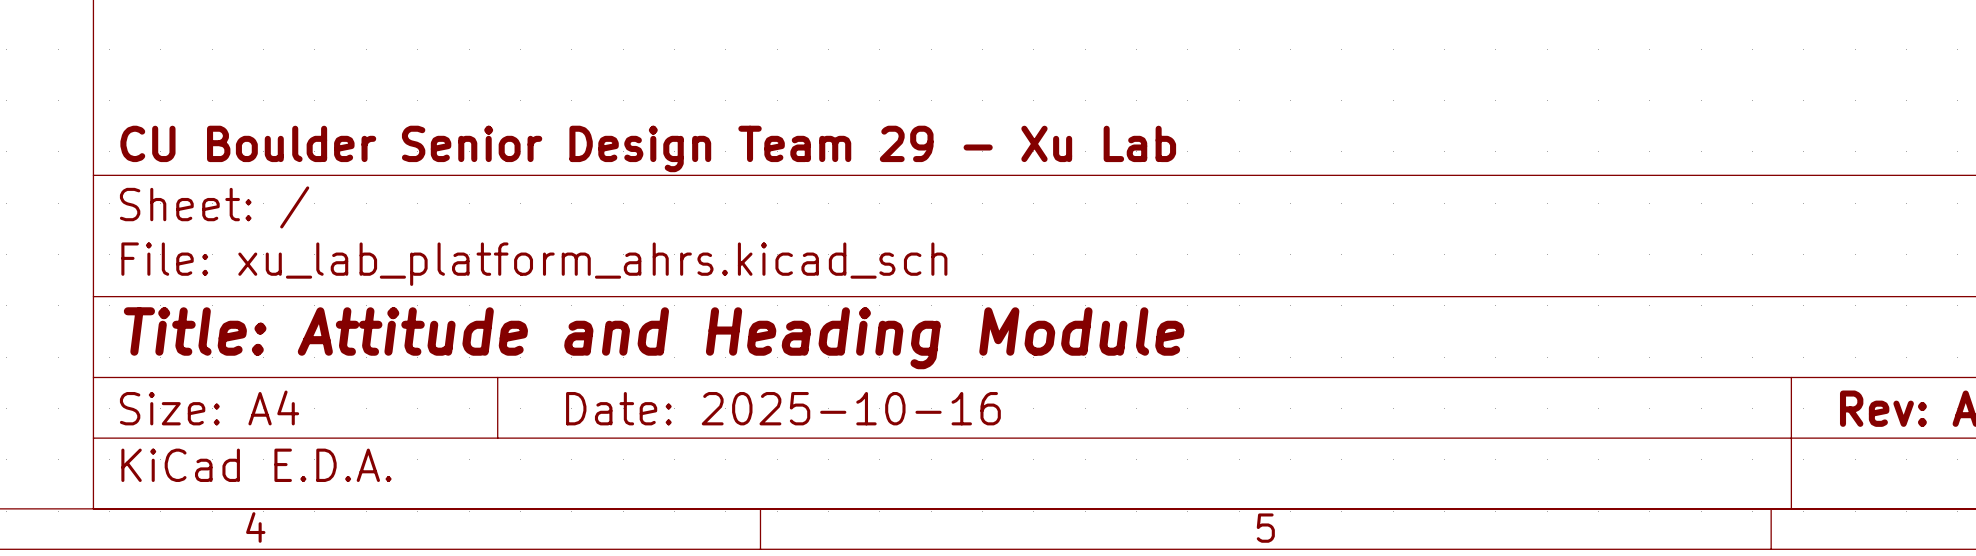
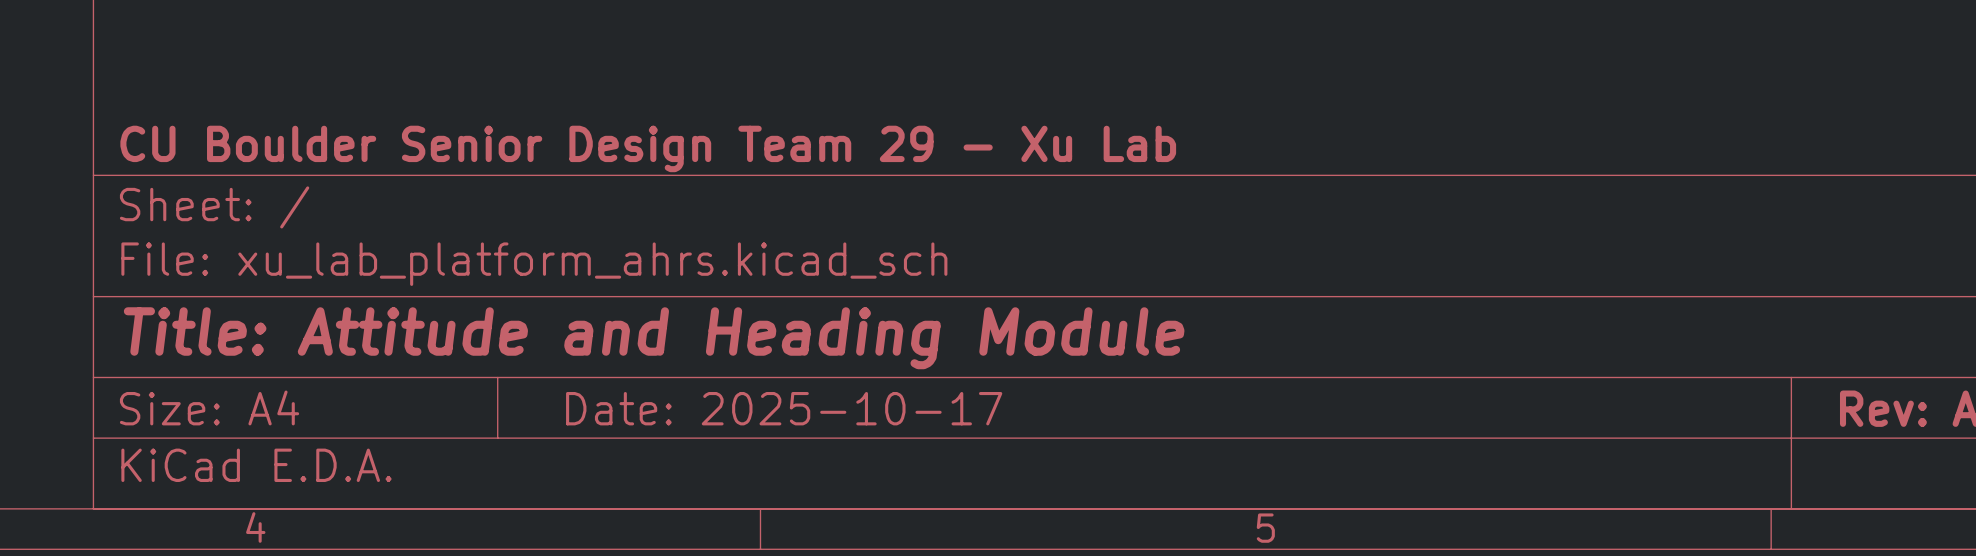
title block: Date: 2025-10-16 (783, 408) -> Date: 2025-10-17 (784, 408)

